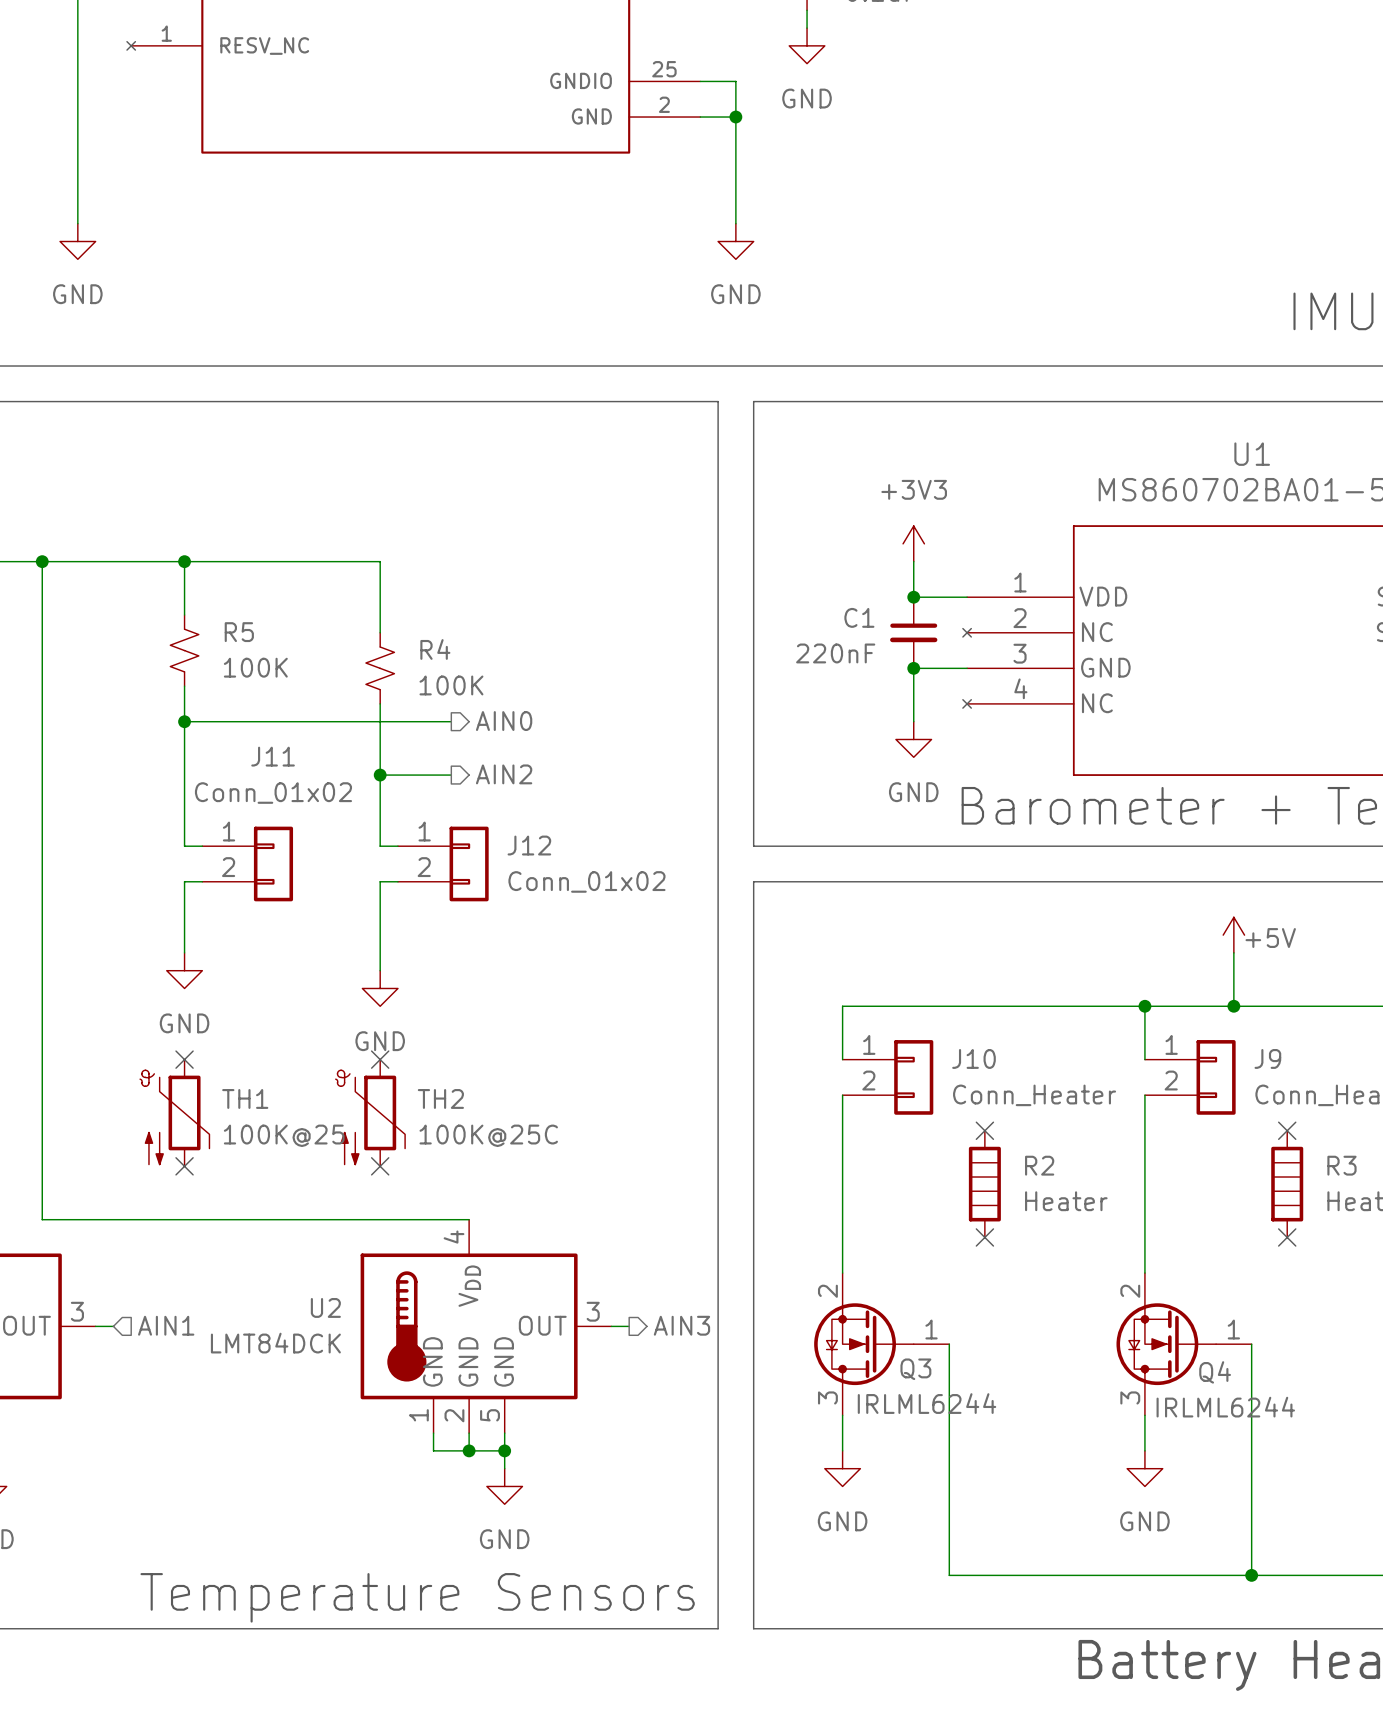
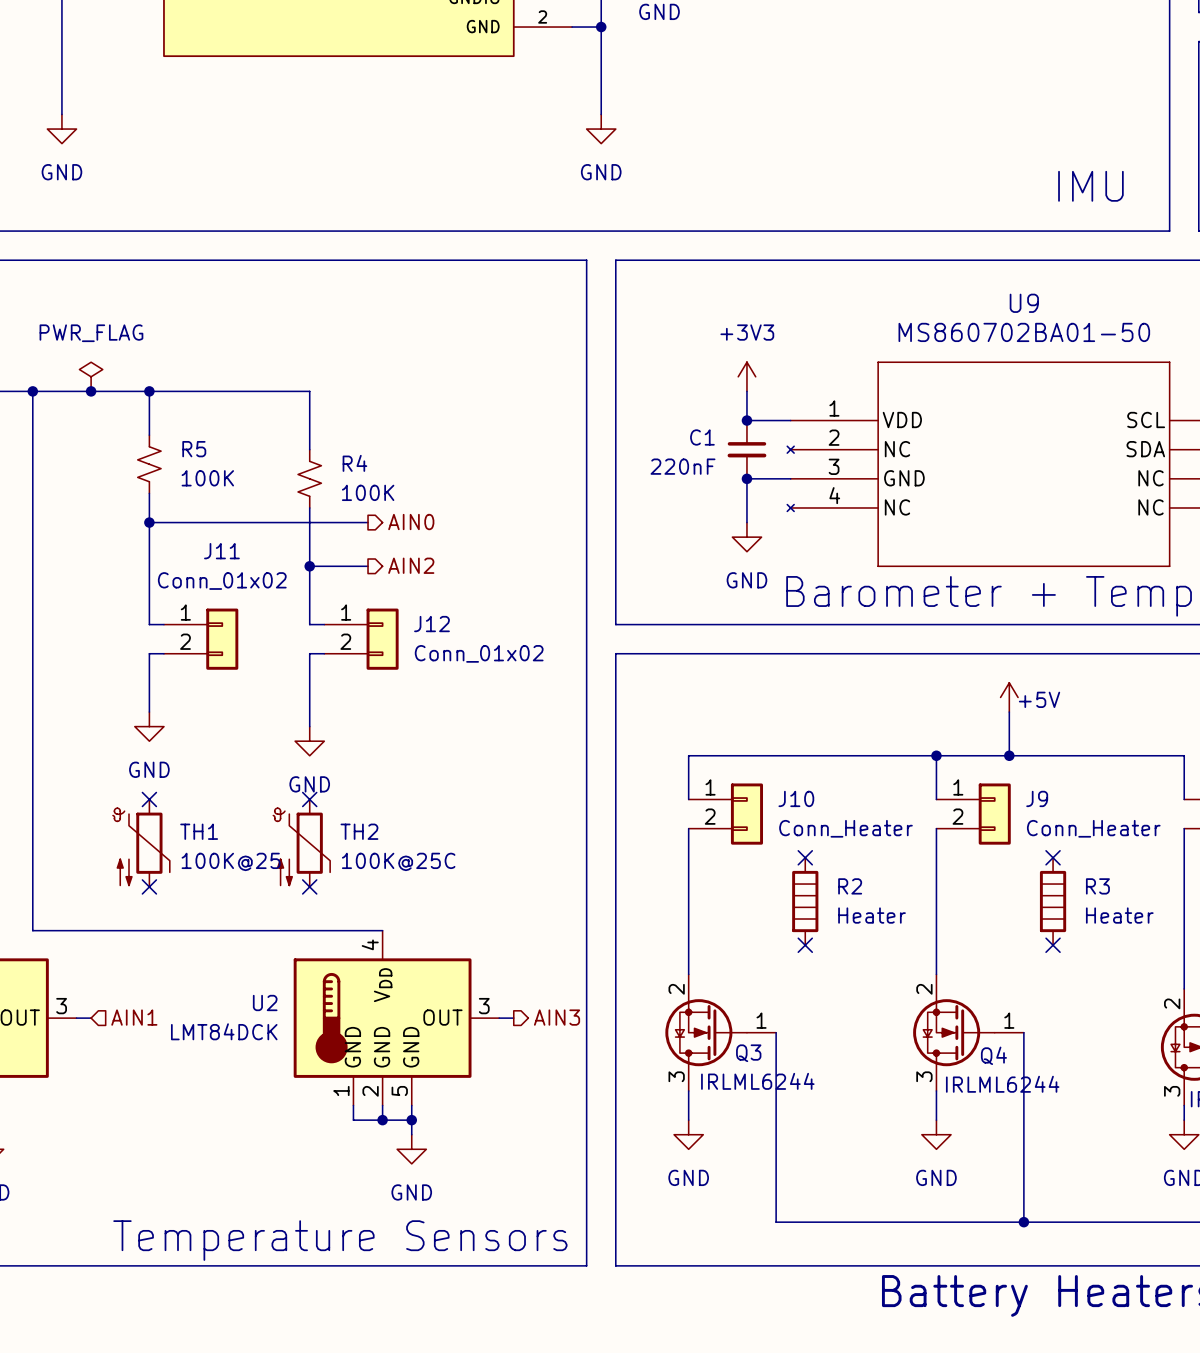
U1 name: U1 (1252, 454) -> U9 (1024, 303)
power symbol: none -> PWR_FLAG (91, 376)
junction: none -> (91, 391)

